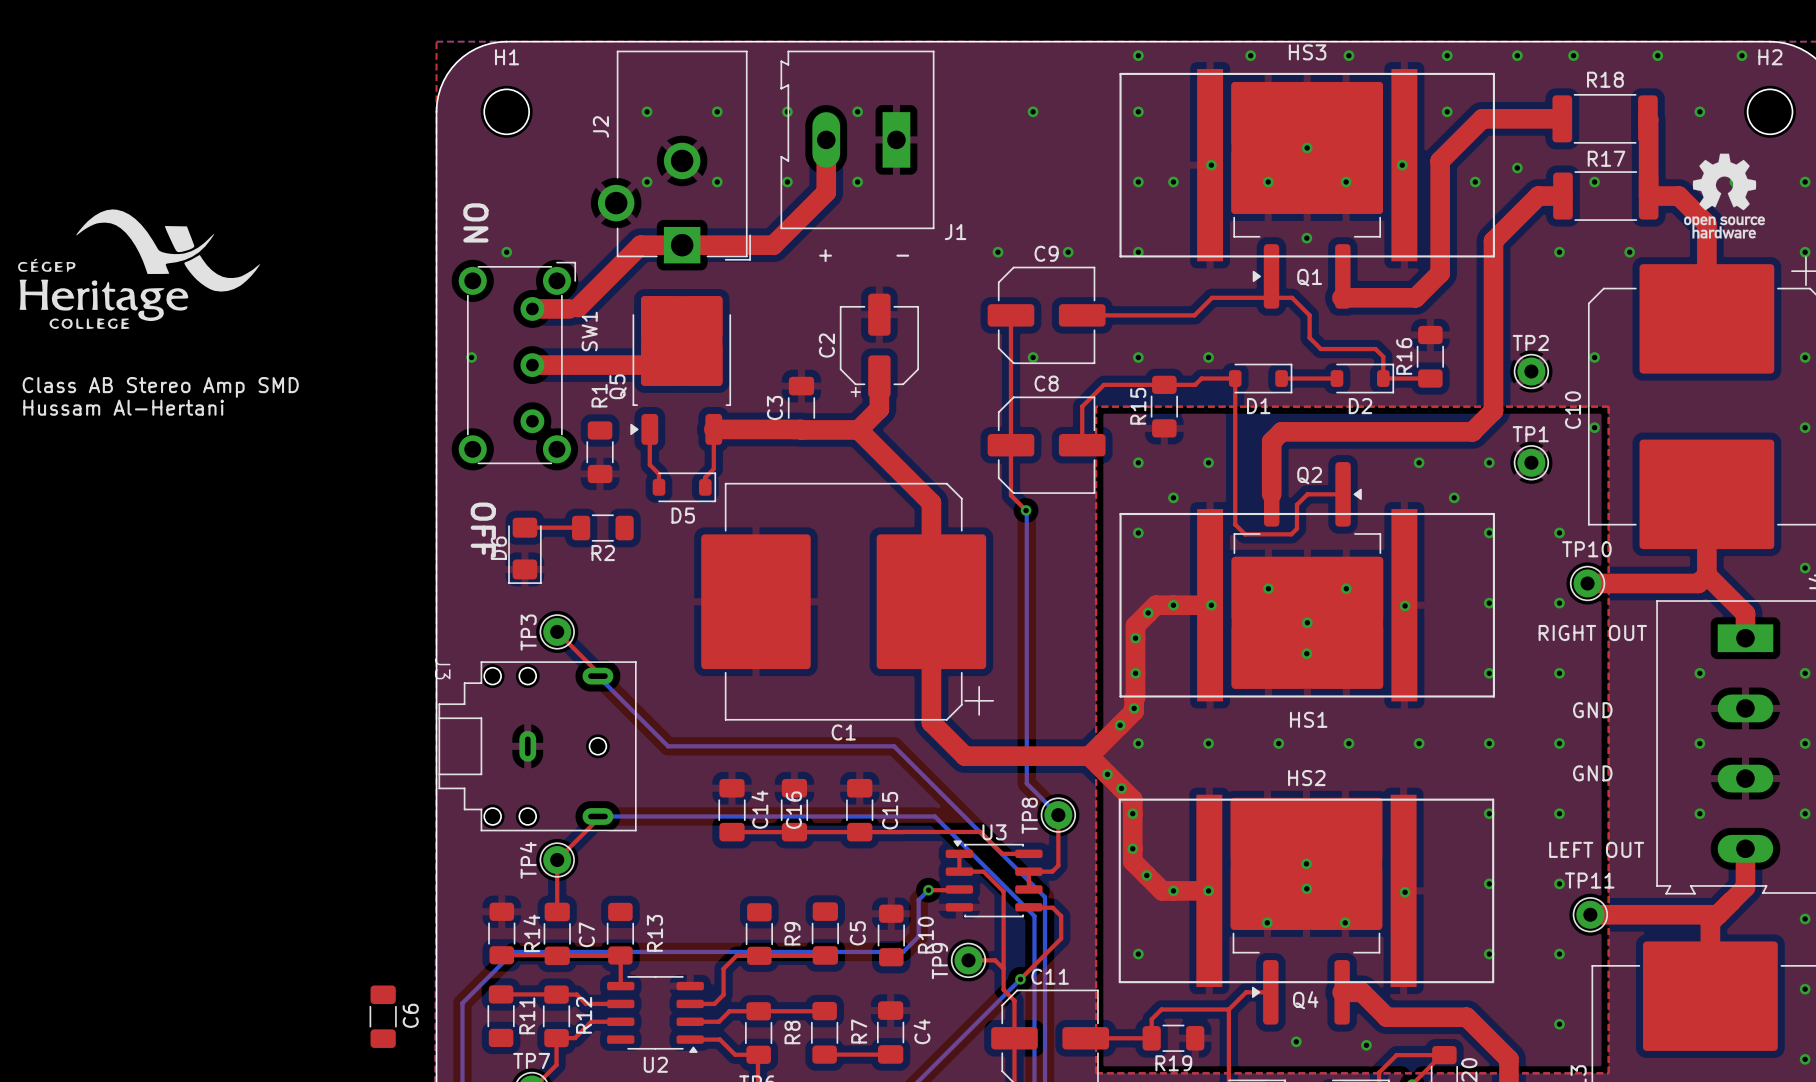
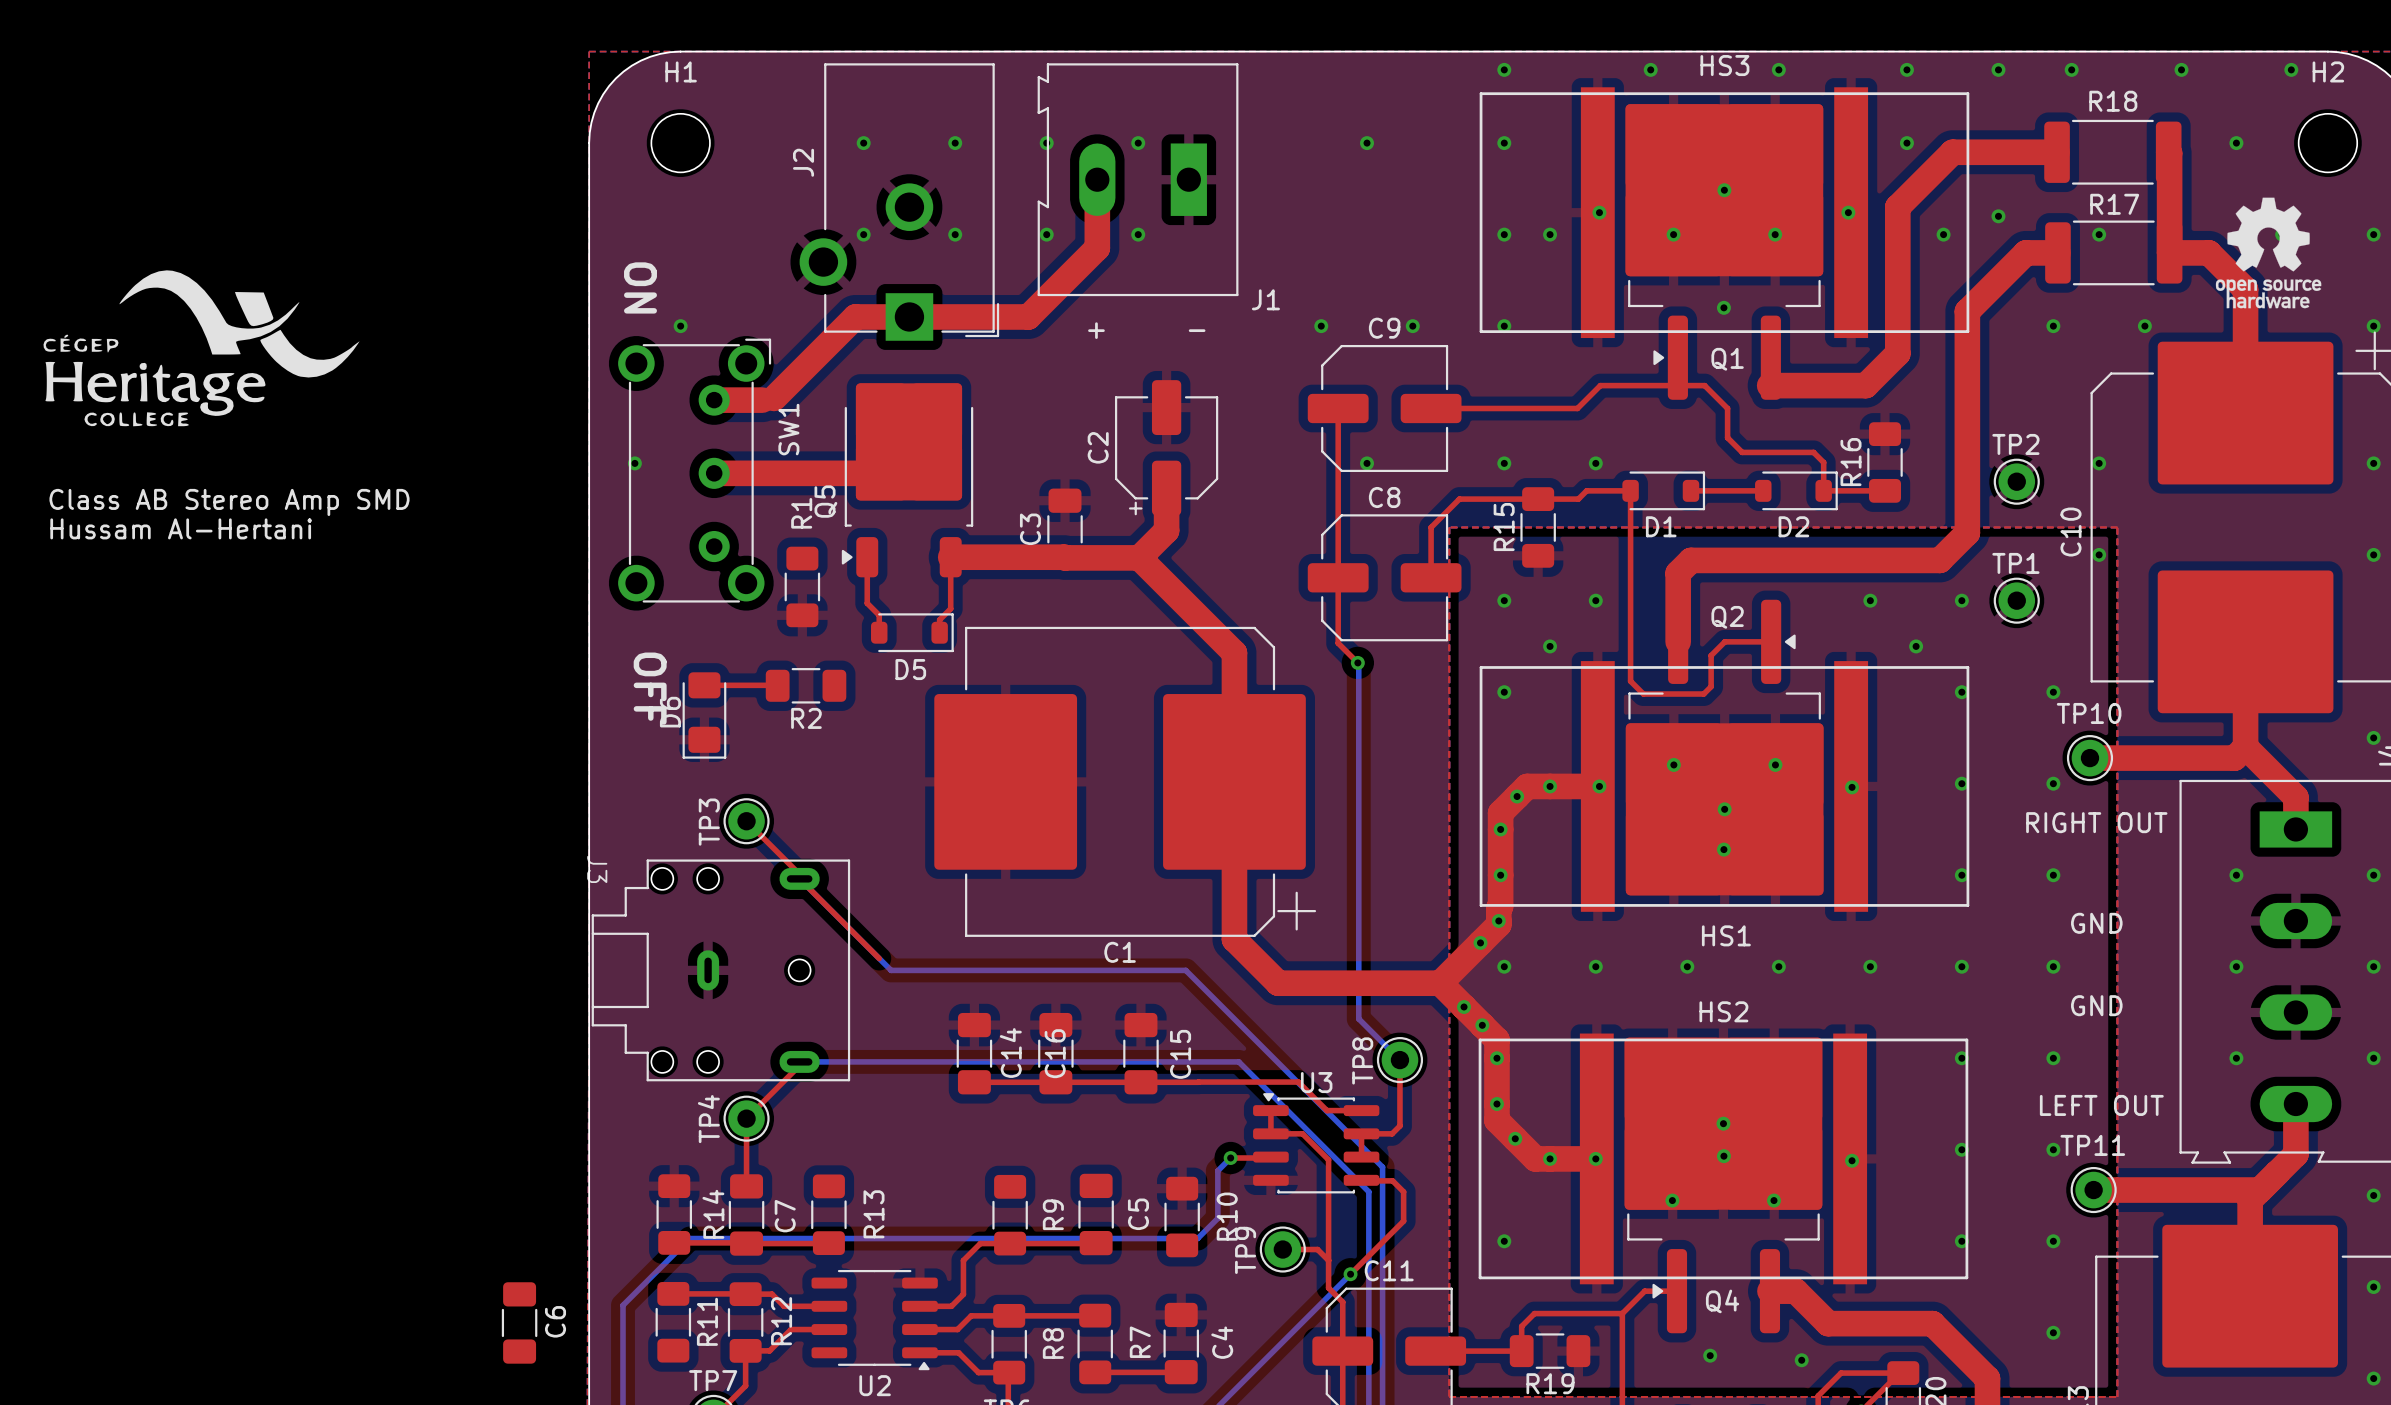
top track: none -> (799, 878) (879, 958)
top track: (620, 955) (620, 986) -> none

